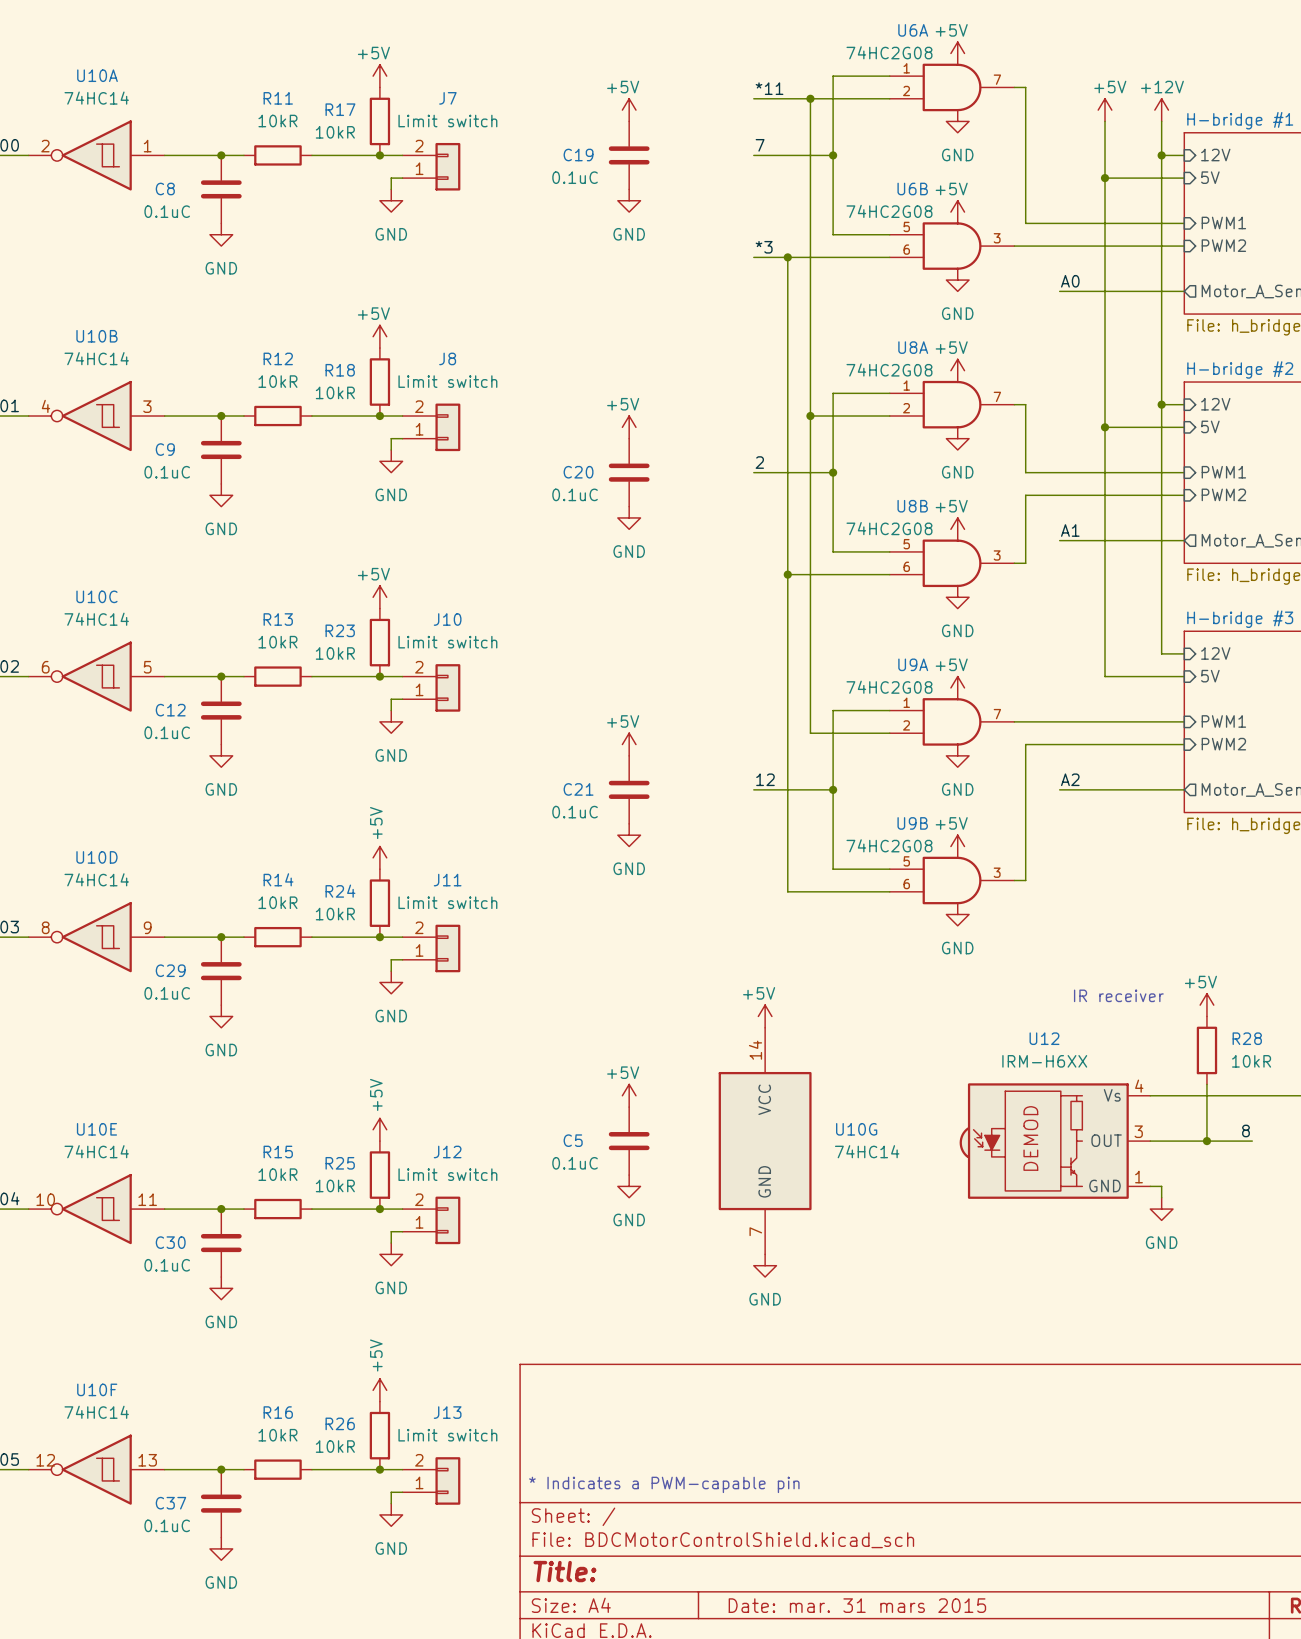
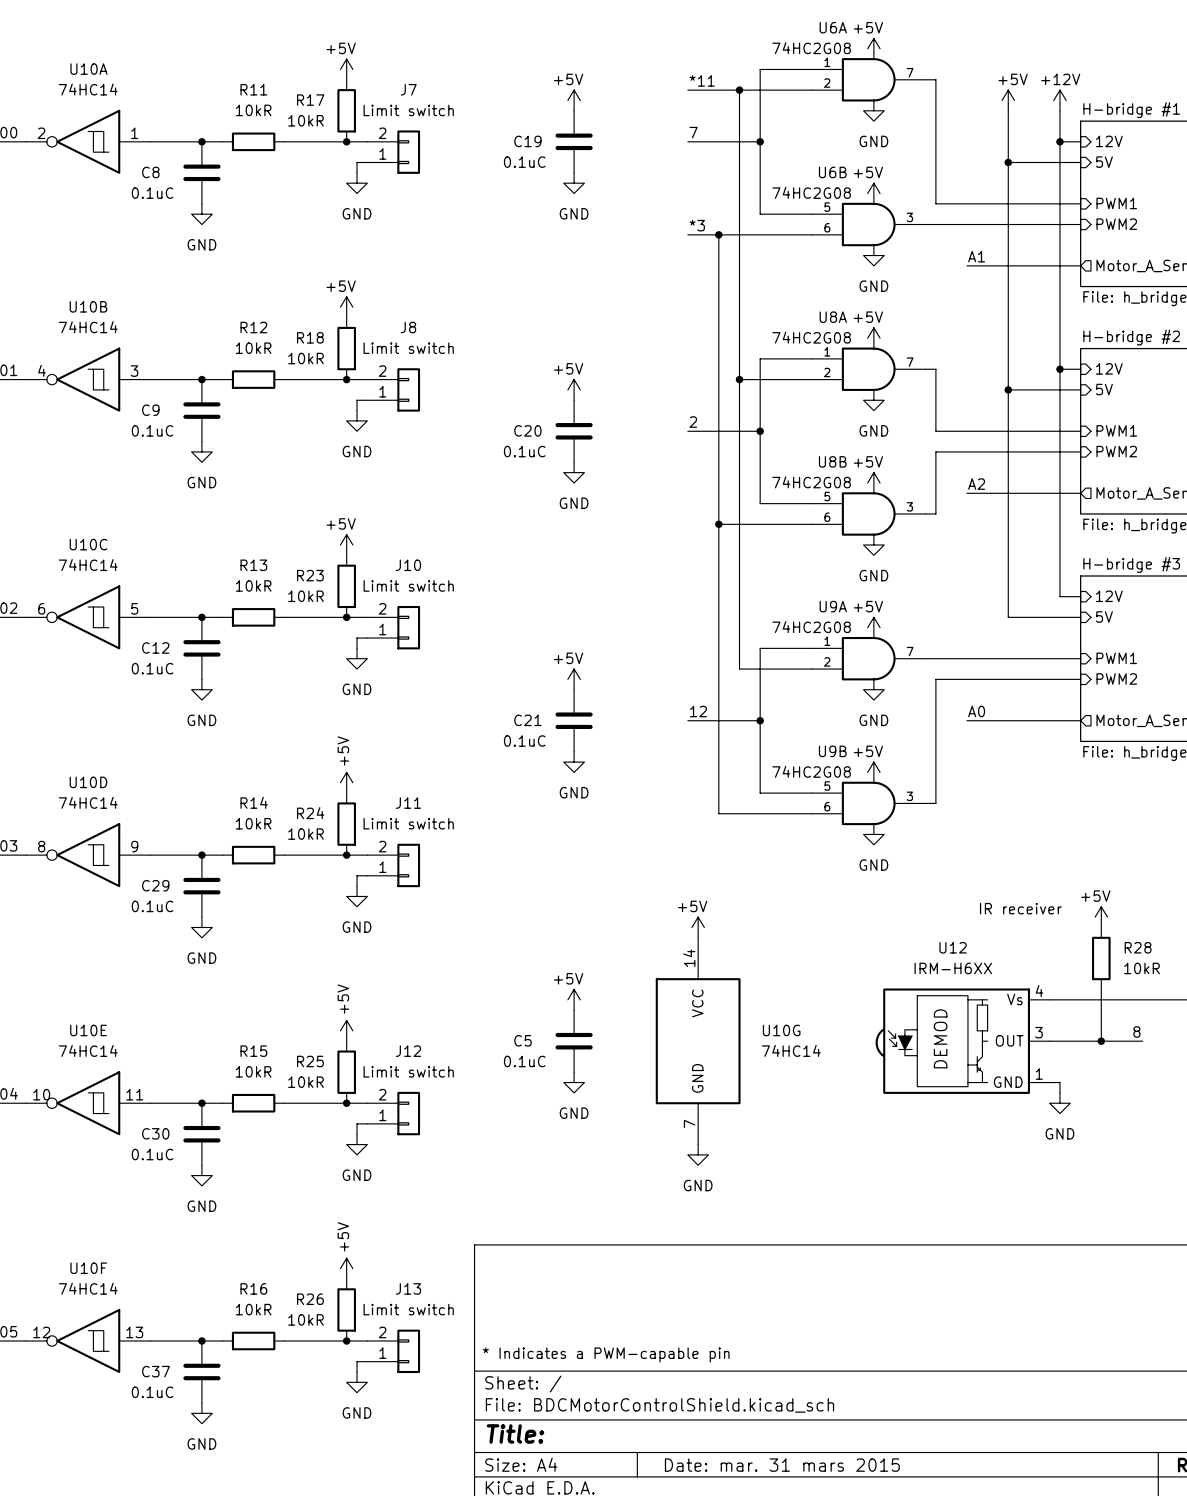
label: A0 (1070, 281) -> A1 (976, 256)
label: A1 (1070, 530) -> A2 (976, 484)
label: A2 (1070, 779) -> A0 (976, 711)

